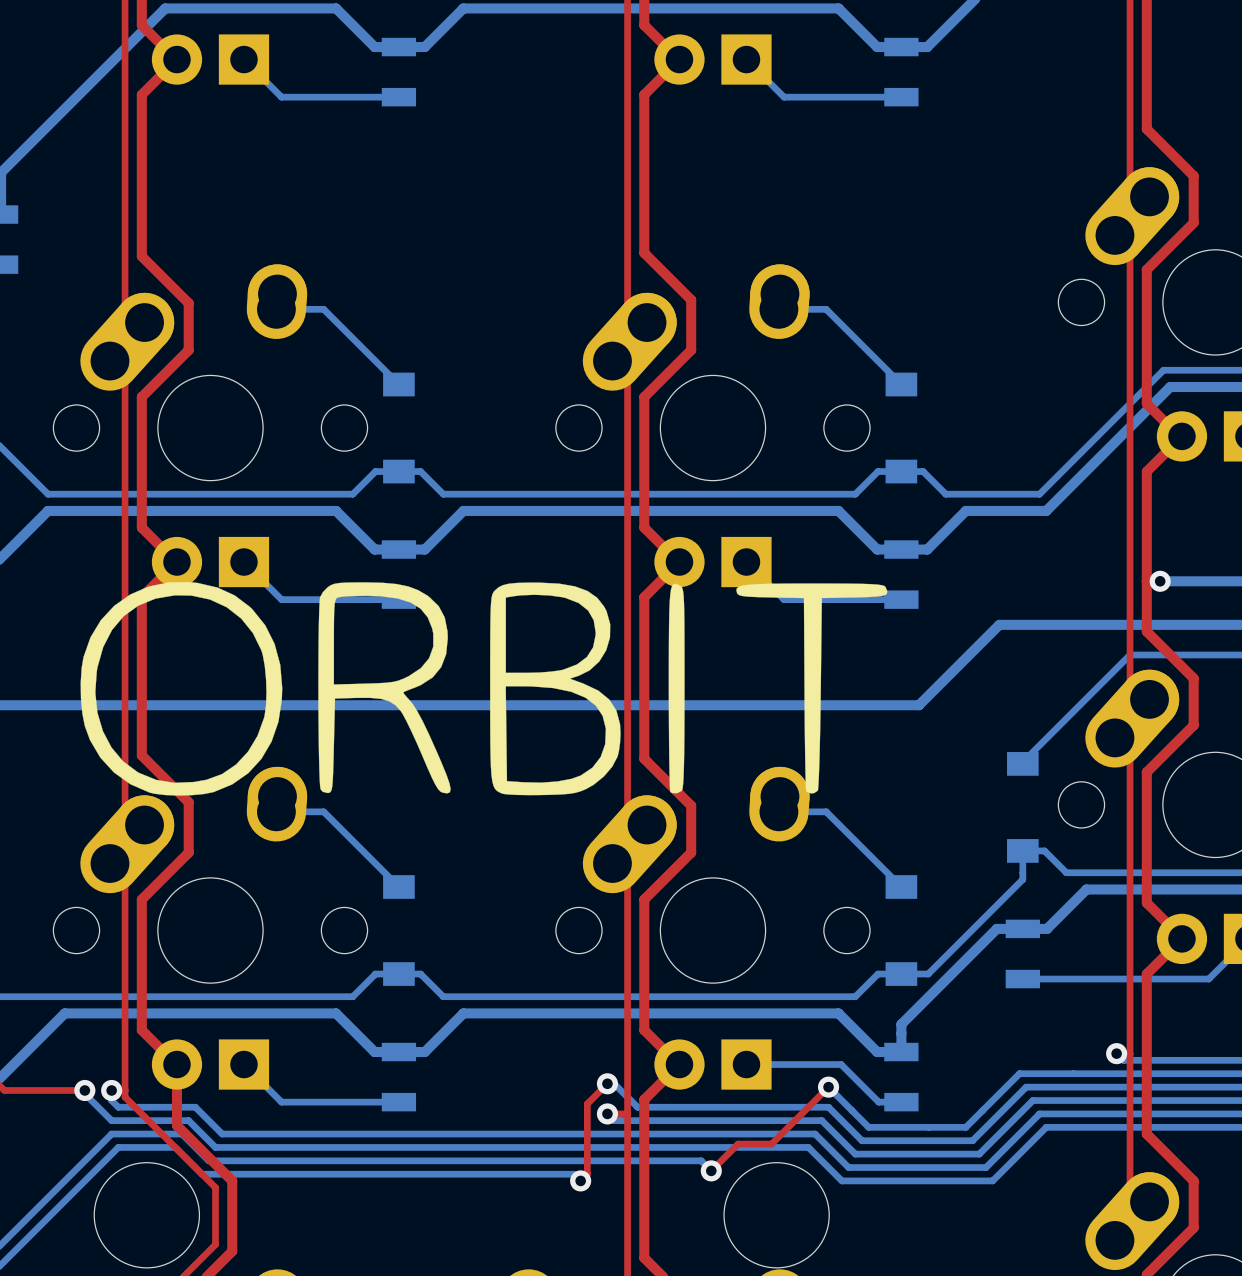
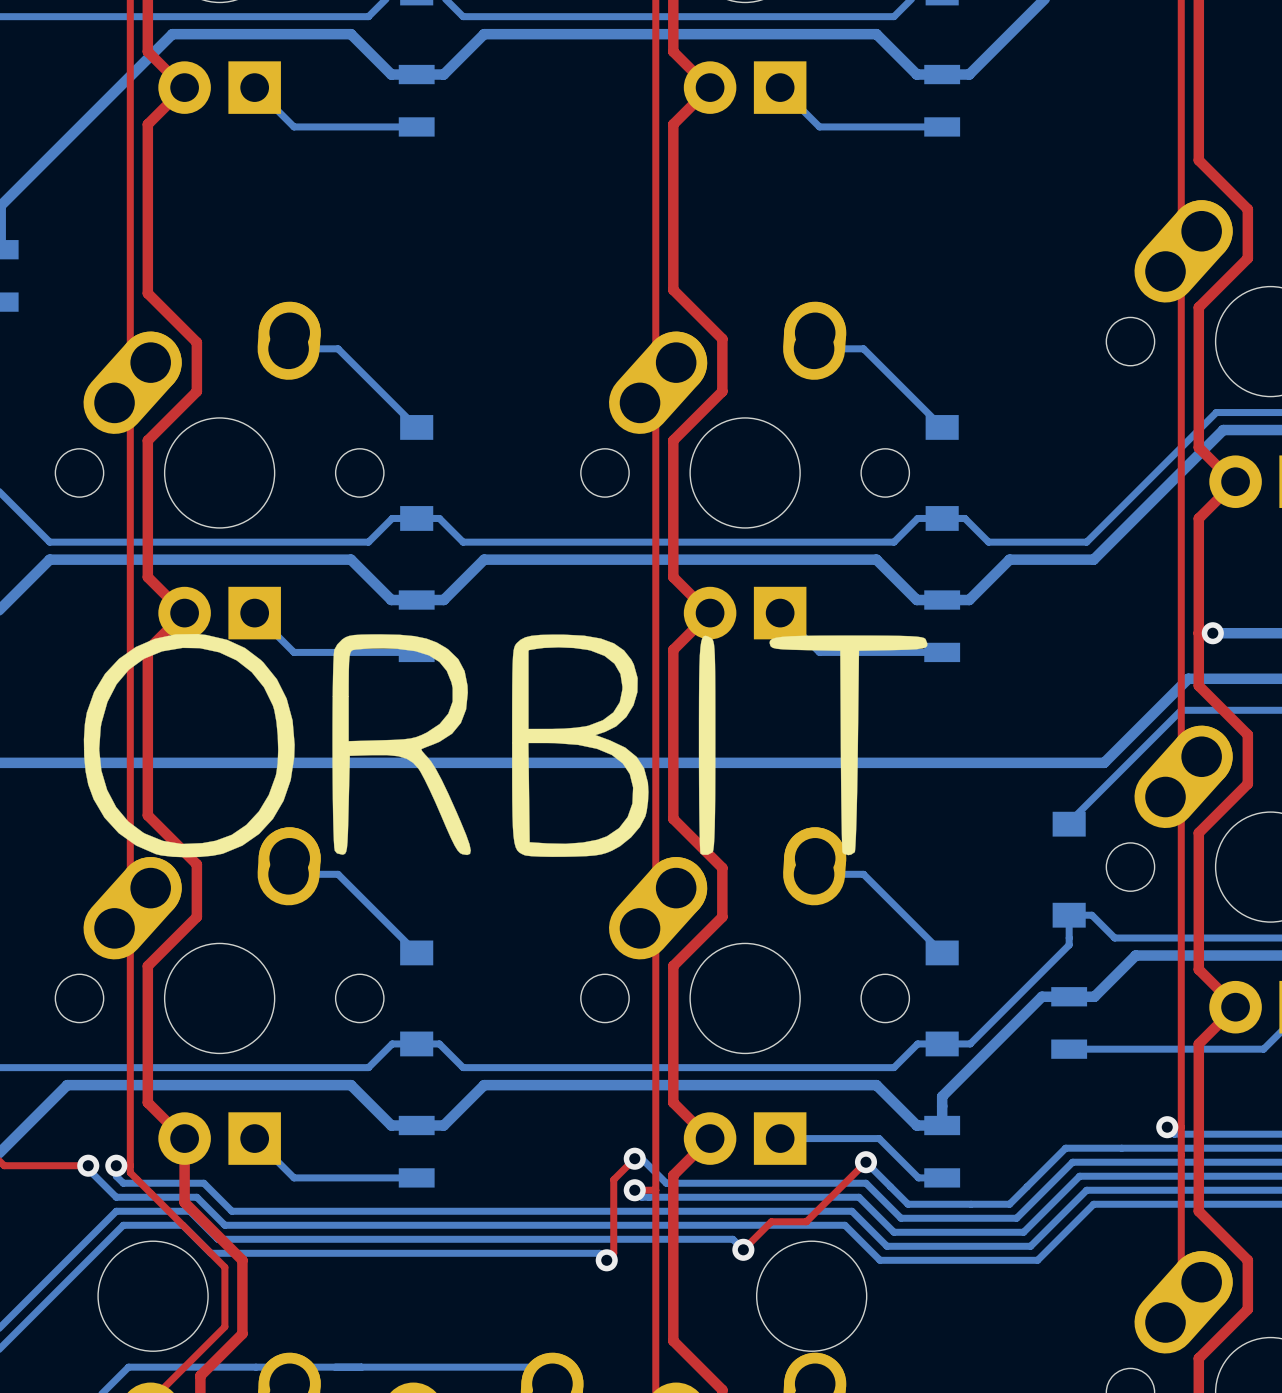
bottom track: (1136, 624) (999, 624) (918, 705) -> (1188, 678) (1104, 762) (960, 762)

